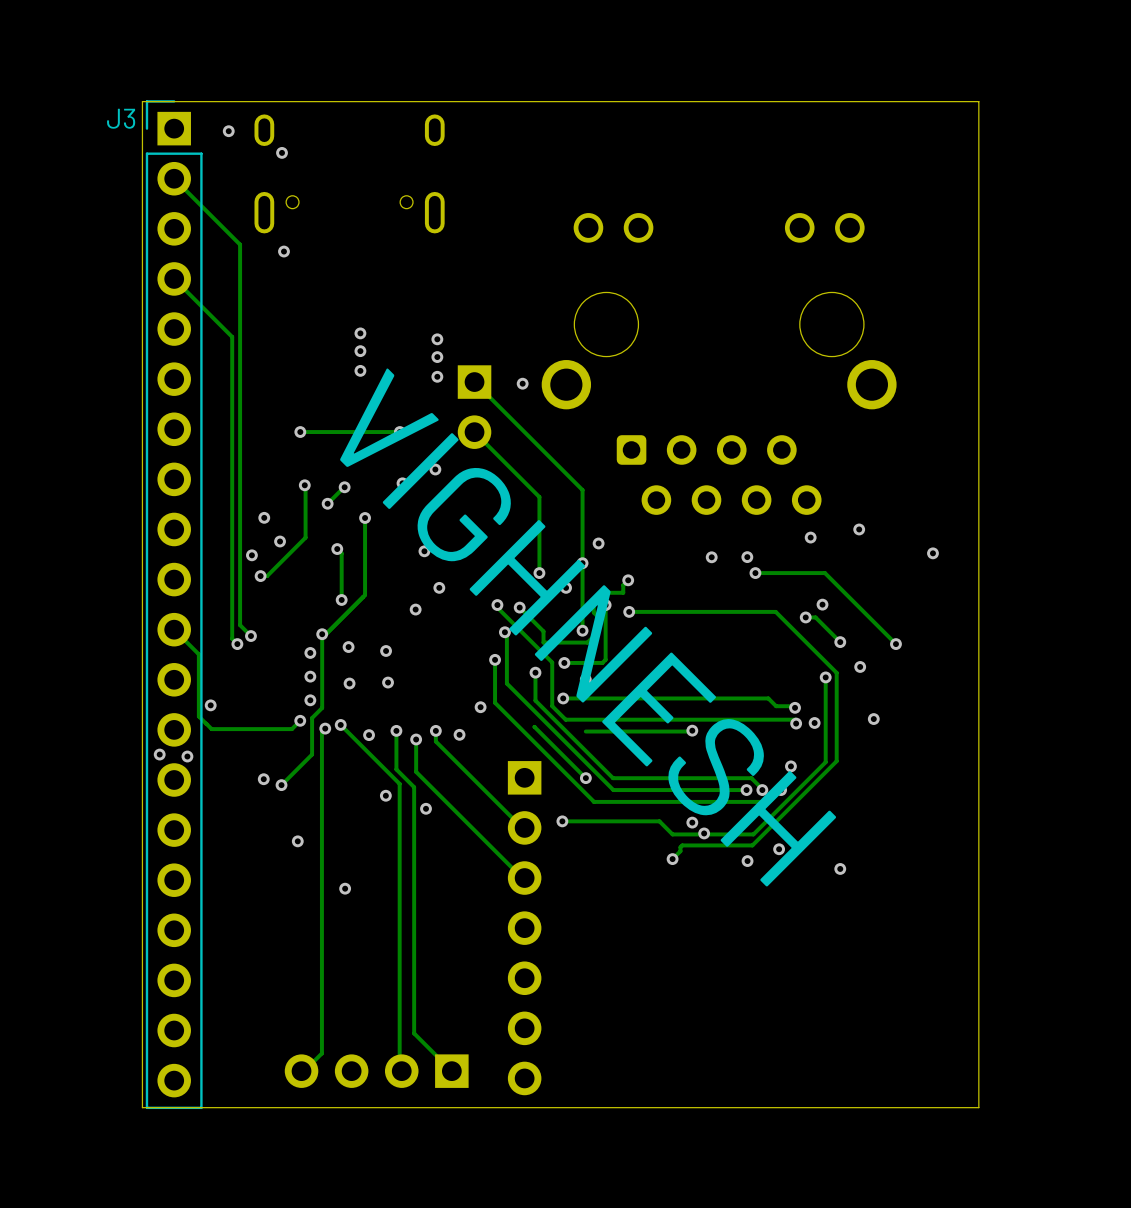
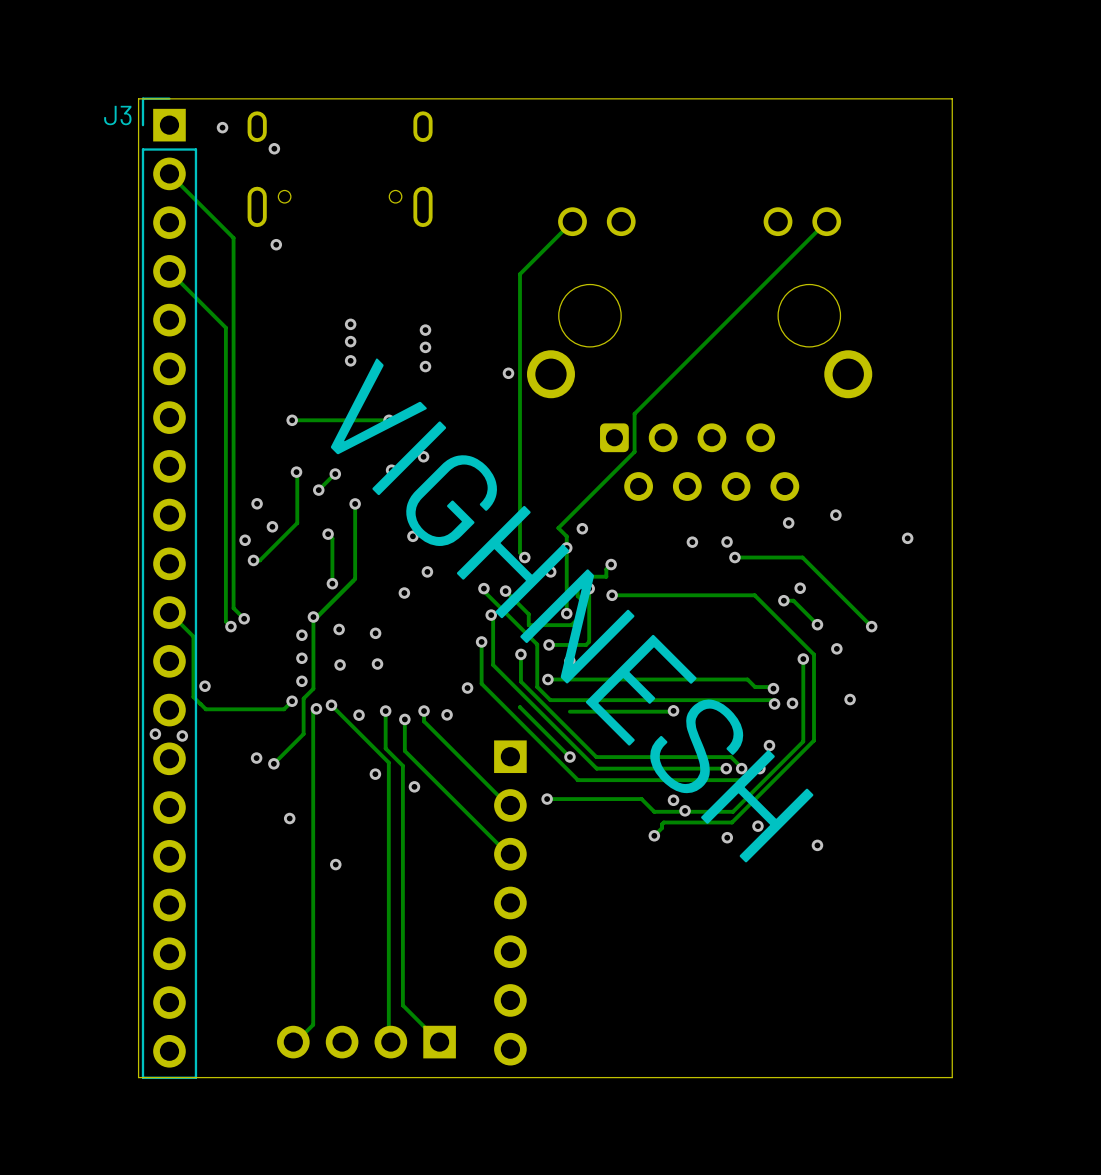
track: (474, 382) (582, 490) (582, 551) -> (826, 221) (634, 413) (634, 451) (558, 528) (566, 536)
part: (474, 407) -> none
track: (474, 432) (539, 497) (539, 573) -> (572, 221) (520, 274) (520, 552) (524, 557)

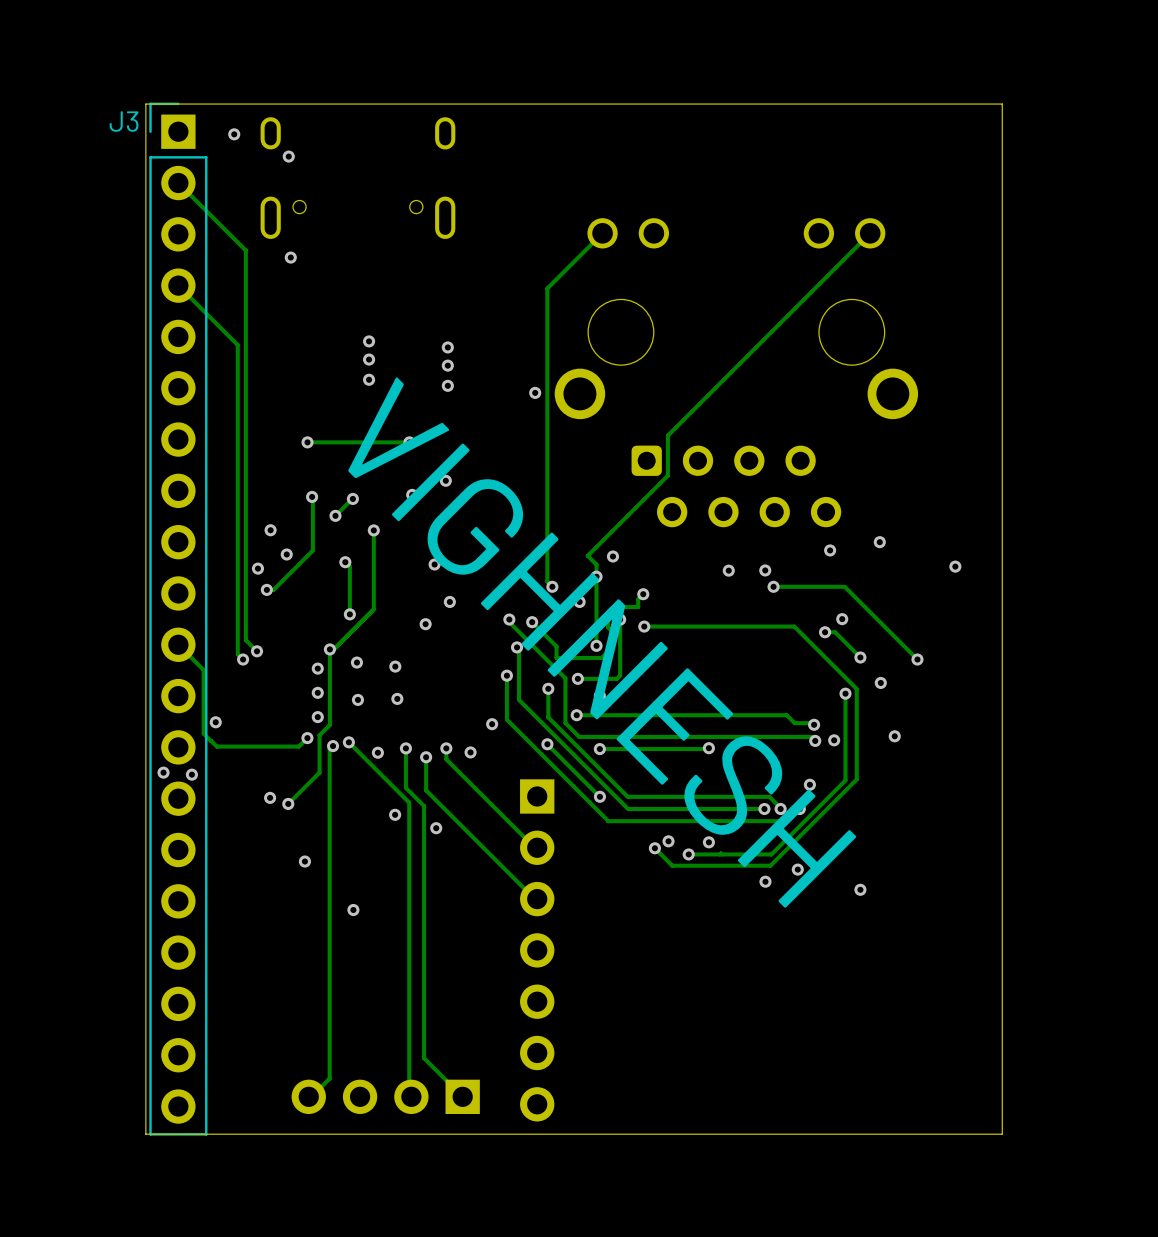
via: none -> (547, 744)
via: none -> (599, 749)
track: (547, 799) (641, 799) (654, 811) -> none
via: (547, 799) -> none
via: none -> (668, 841)
via: none -> (654, 848)
via: (685, 810) -> none
via: none -> (688, 854)
track: (663, 822) (662, 828) (654, 835) -> (698, 865) (672, 865) (654, 848)
via: (654, 835) -> none

